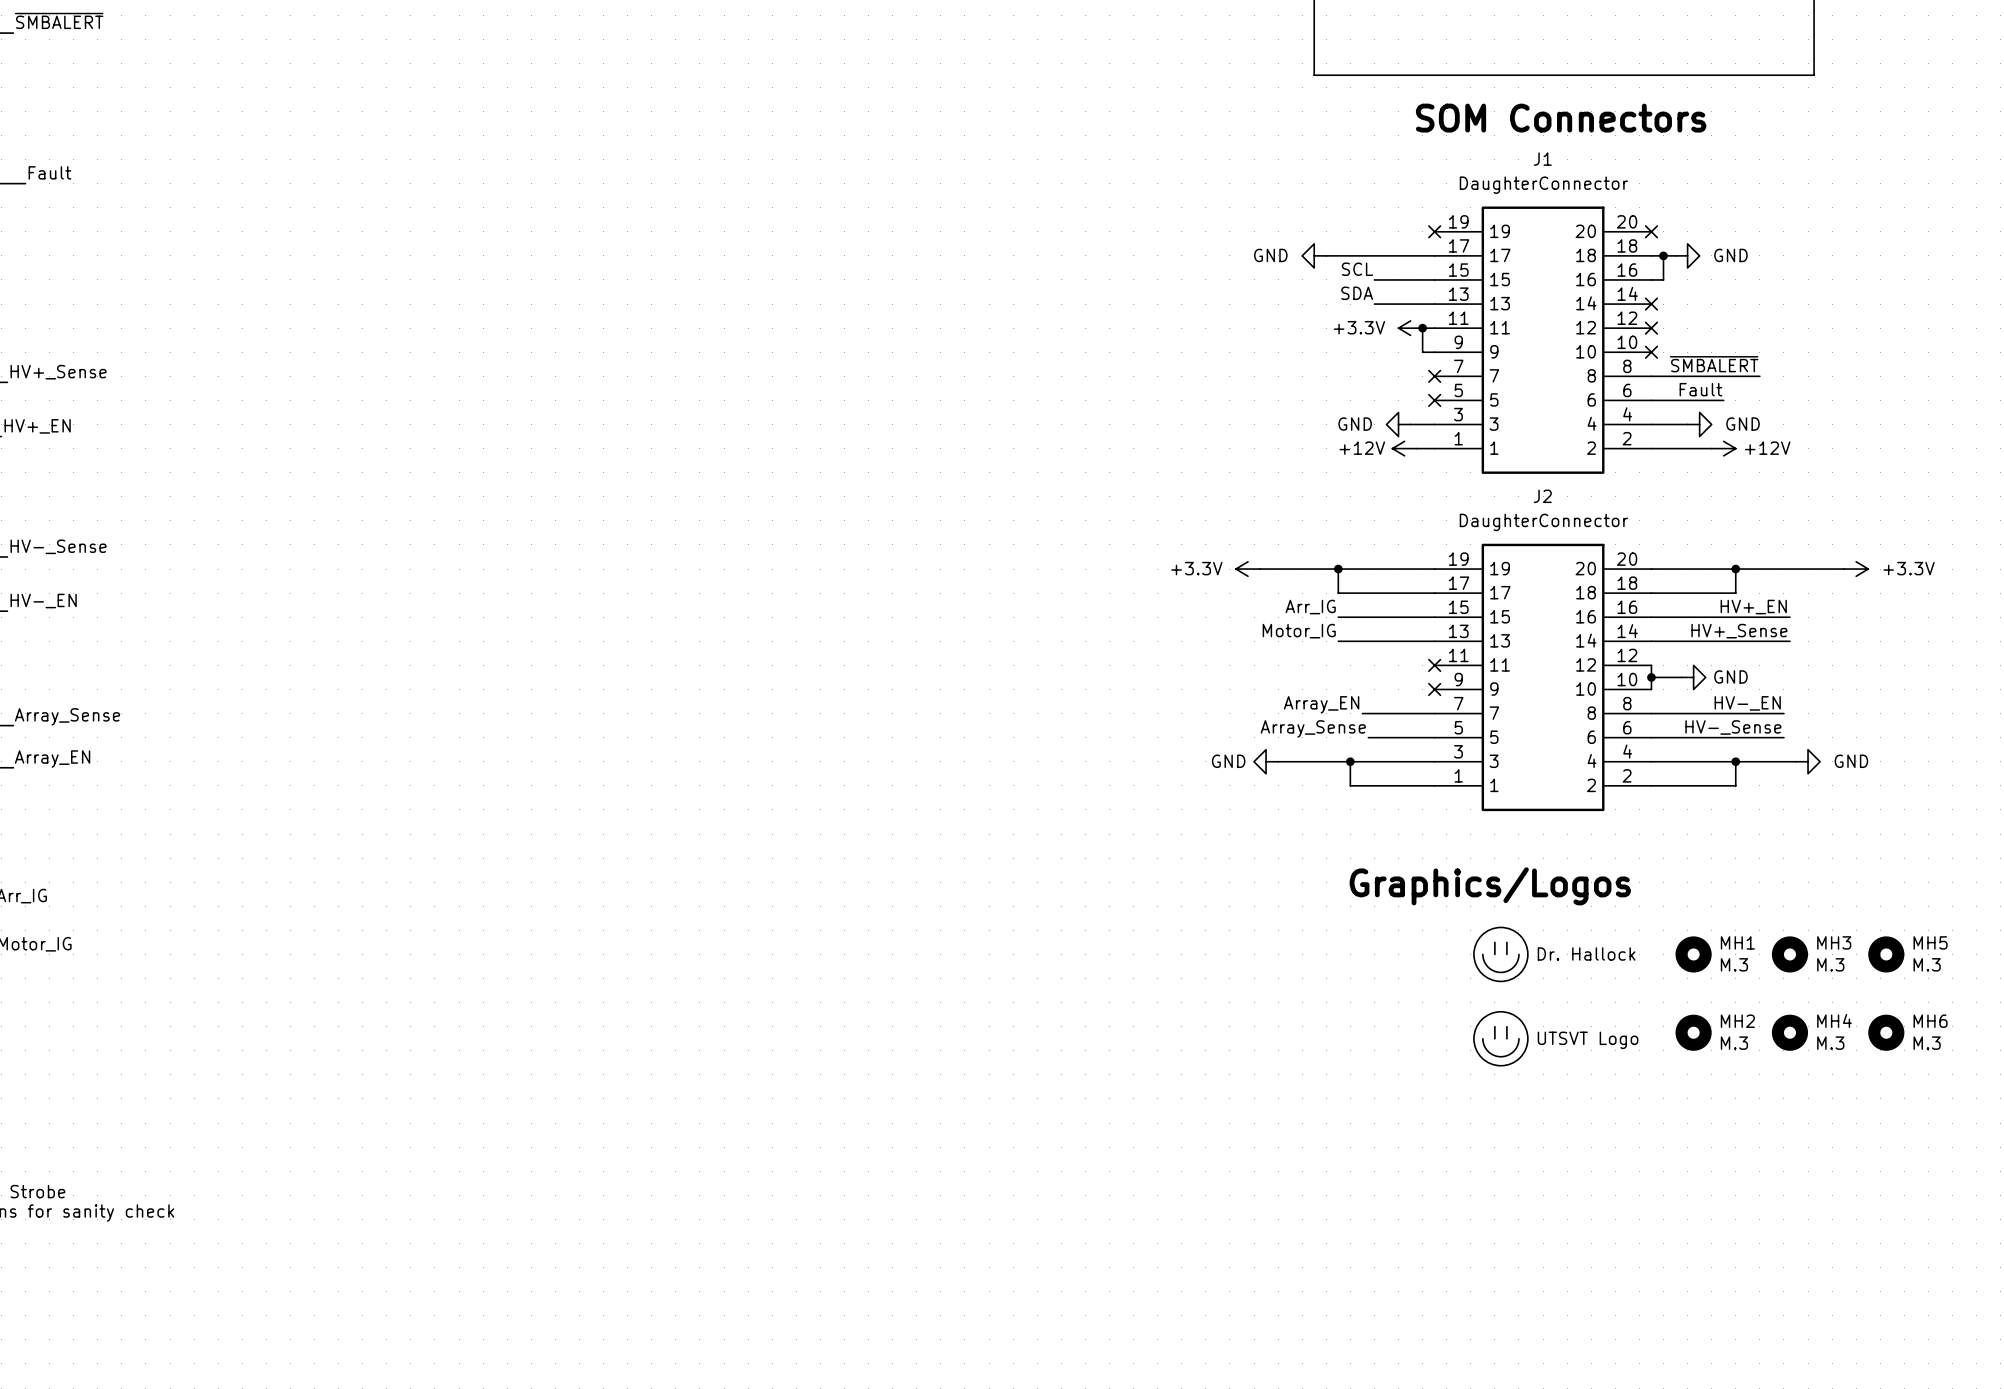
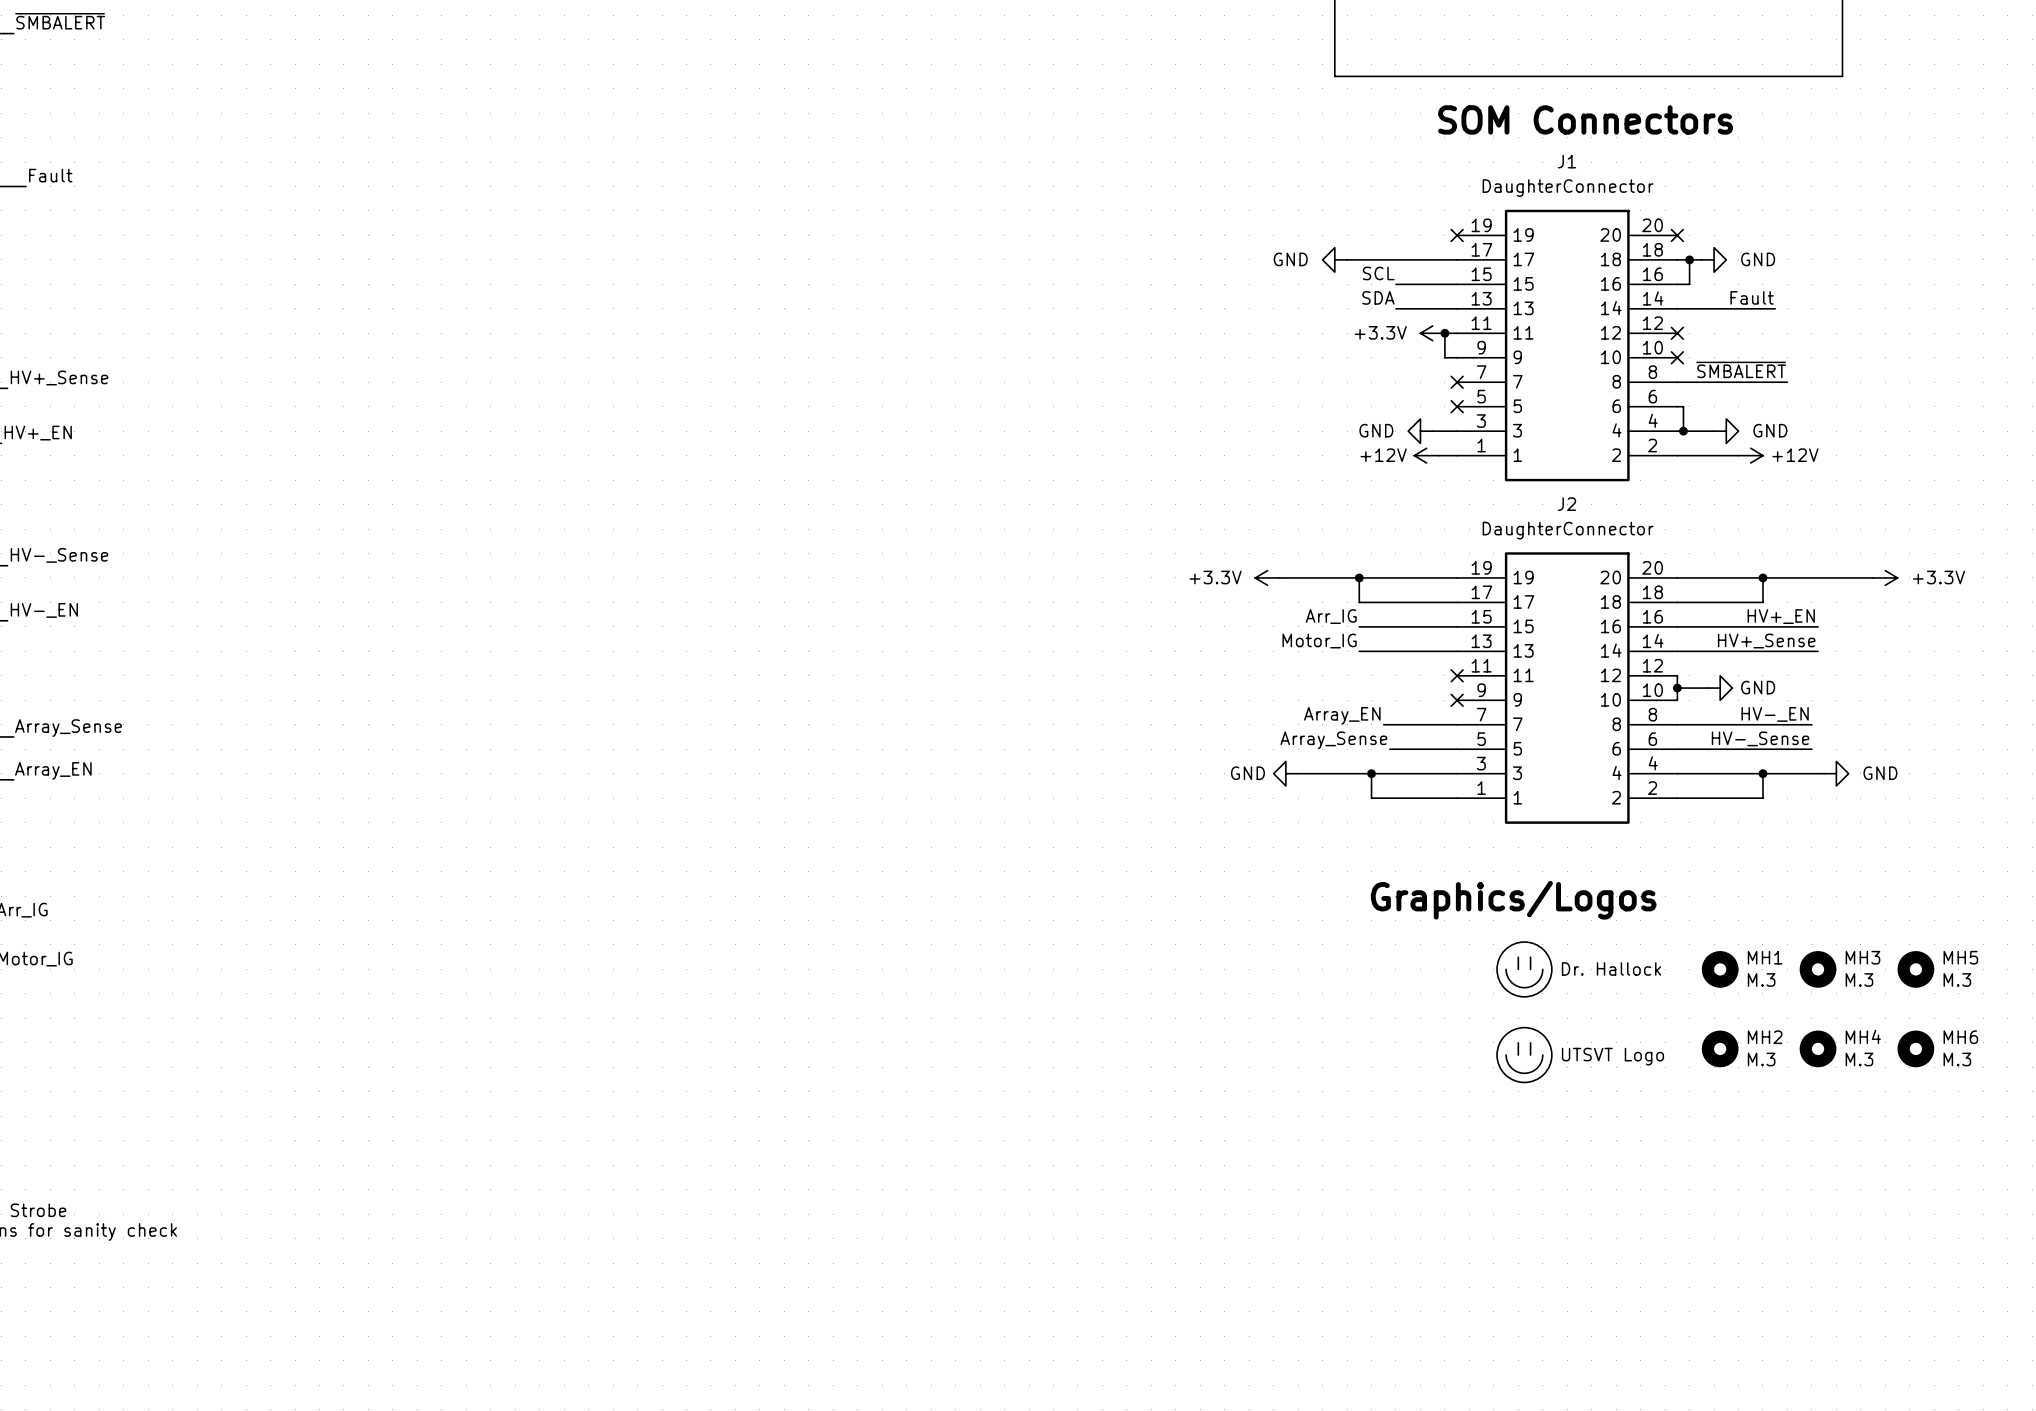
wire: none -> (1677, 308) (1775, 308)
no-connect mark: (1651, 304) -> none
label position: Fault (1700, 389) -> Fault (1752, 297)
wire: (1657, 400) (1723, 400) -> (1683, 406) (1683, 431)
junction: none -> (1683, 431)

